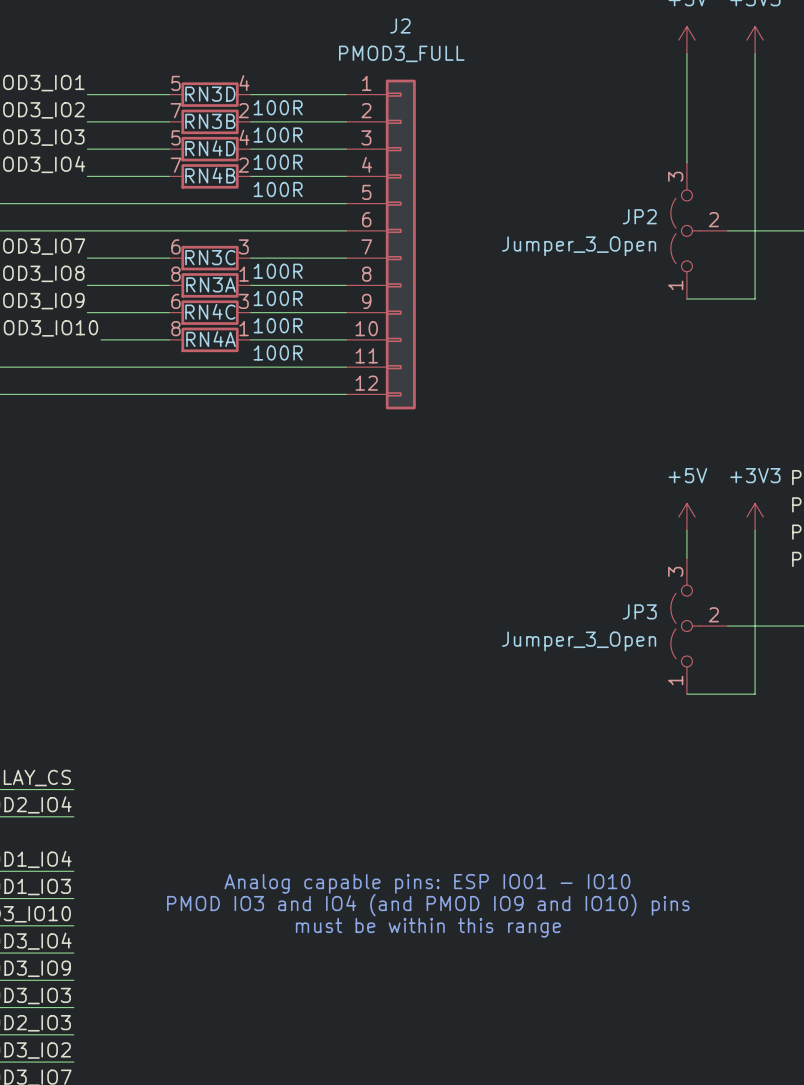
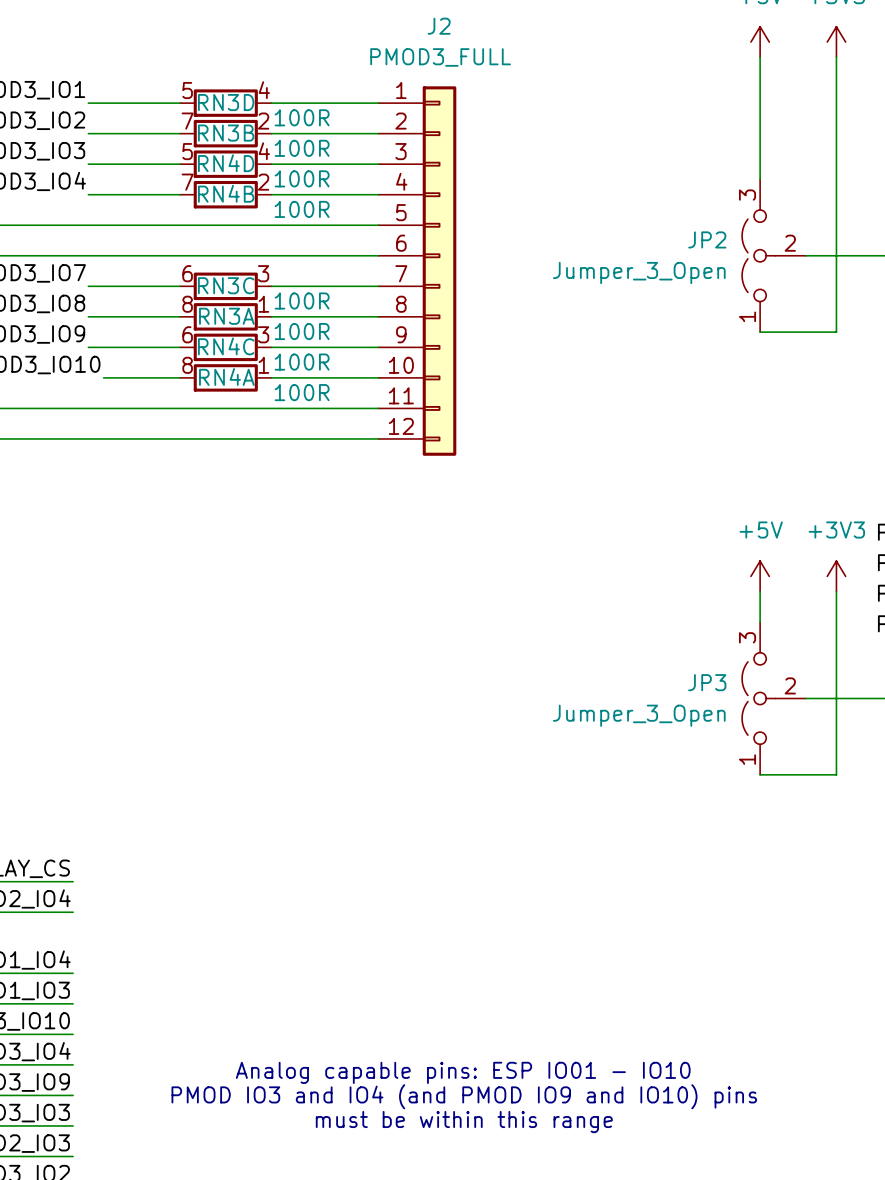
text position: Analog capable pins: ESP IO01 - IO10 (427, 883) -> Analog capable pins: ESP IO01 - IO10 (463, 1072)
text position: PMOD IO3 and IO4 (and PMOD IO9 and IO10) pins (428, 905) -> PMOD IO3 and IO4 (and PMOD IO9 and IO10) pins (464, 1096)
text position: must be within this range (428, 927) -> must be within this range (464, 1122)

